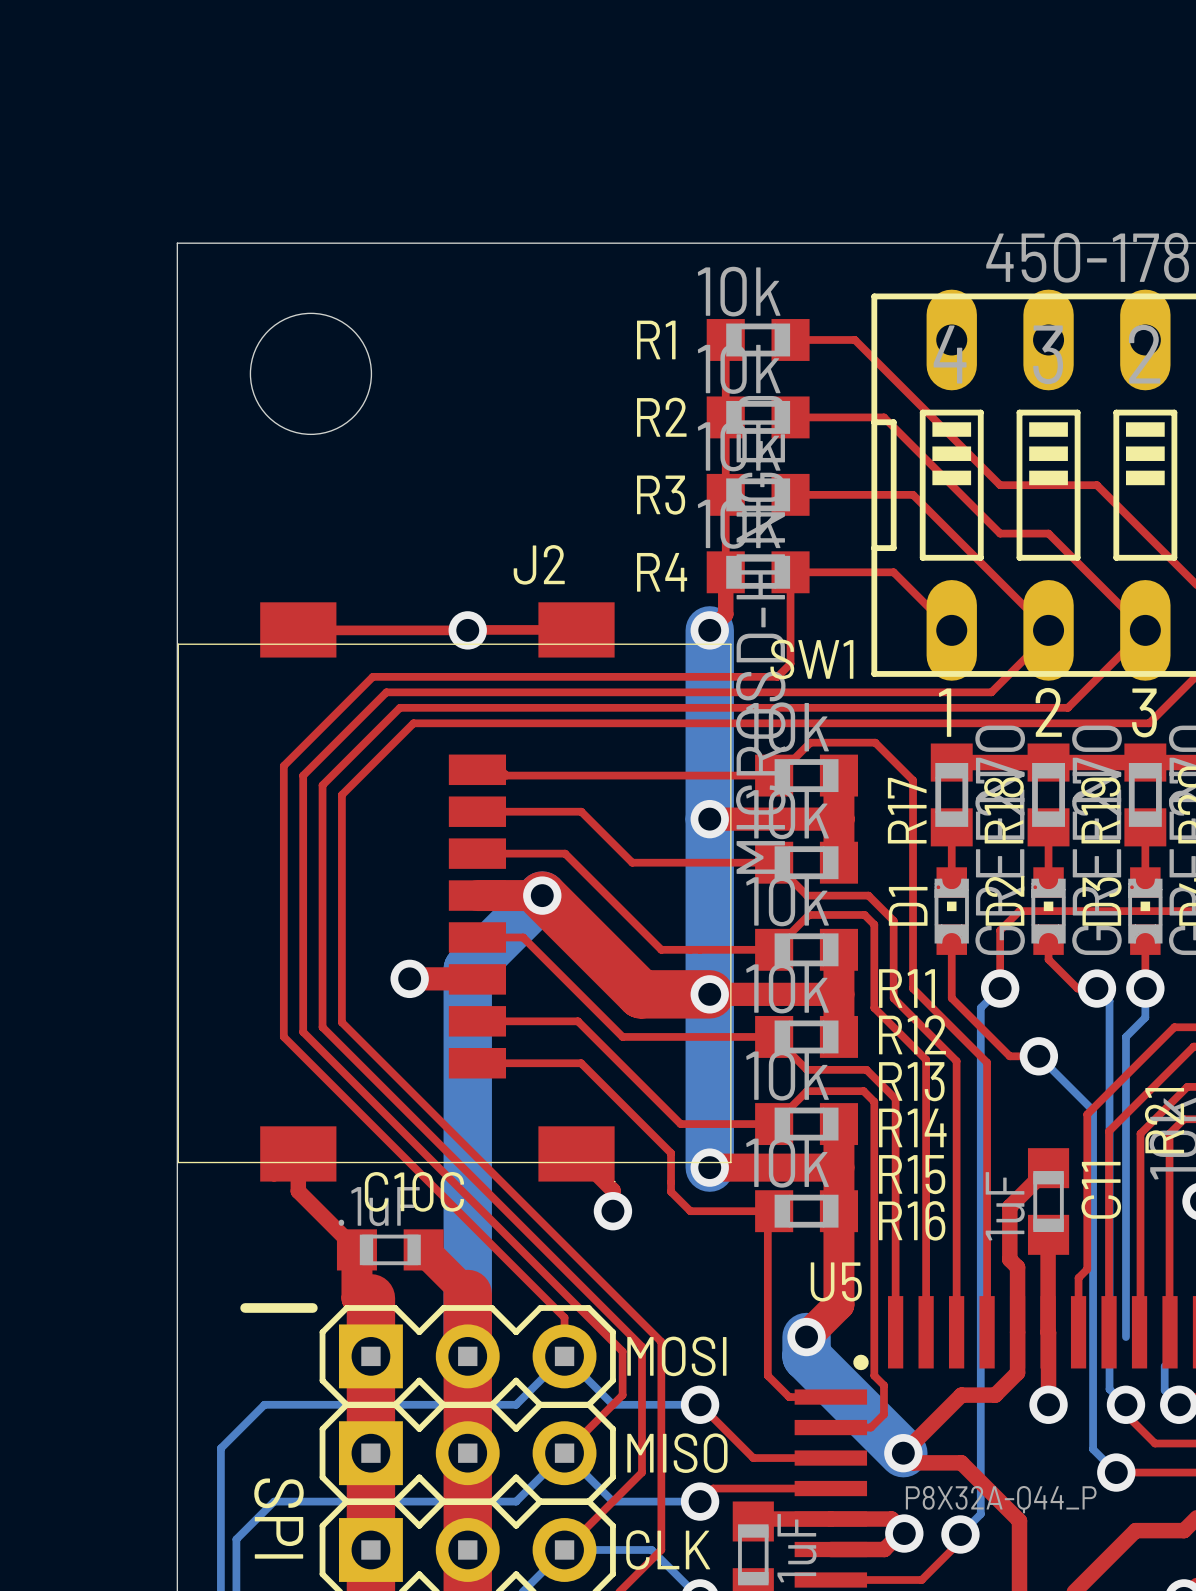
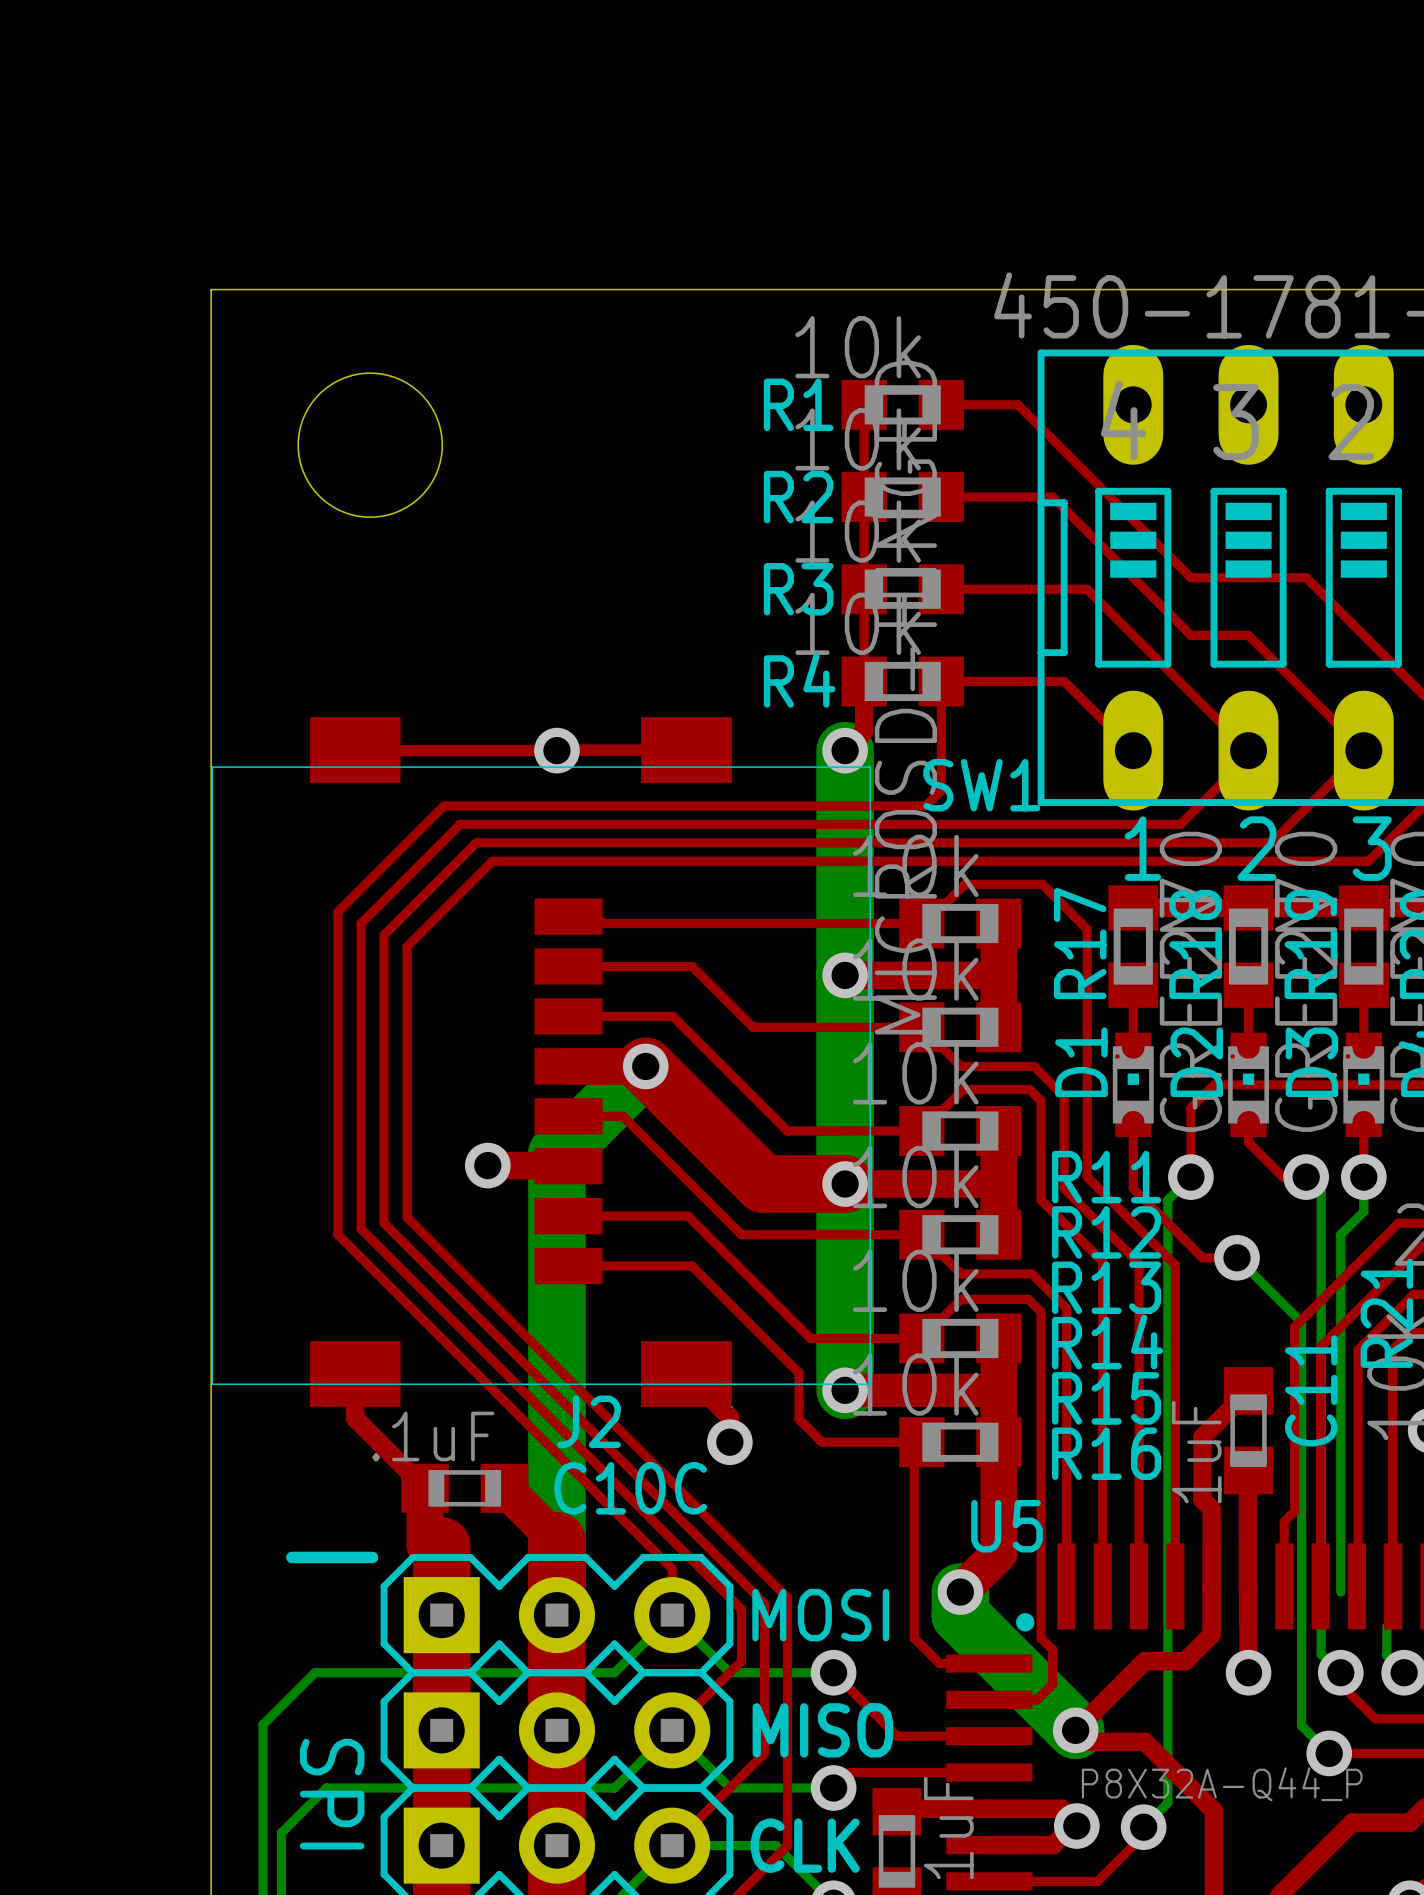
J2 name position: J2 (539, 564) -> J2 (589, 1421)
C10C name position: C10C (414, 1191) -> C10C (630, 1488)

